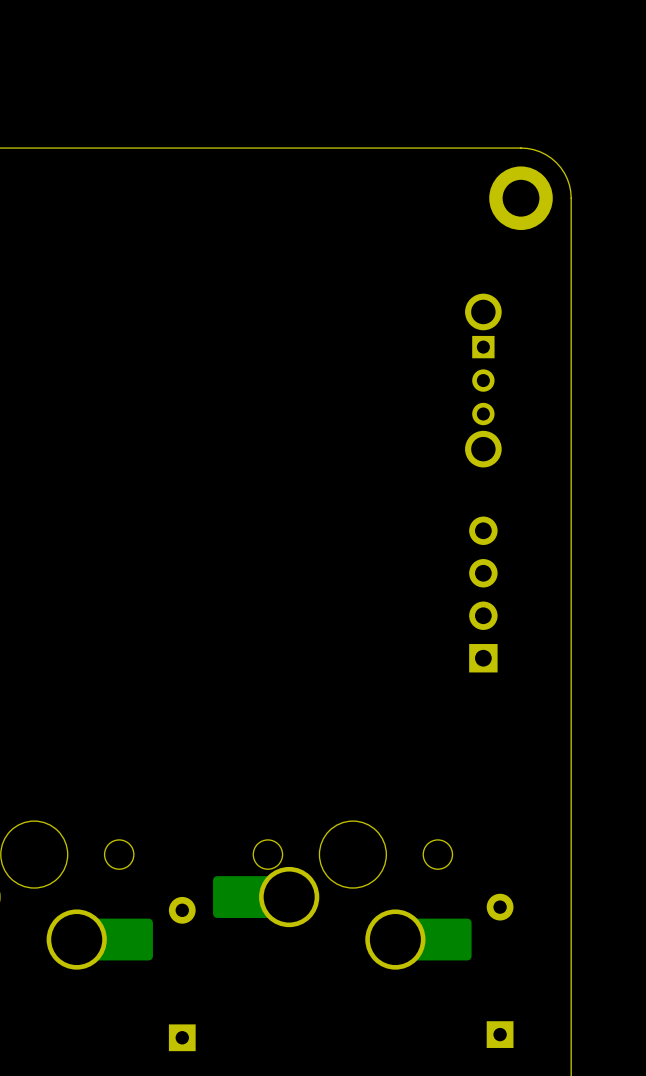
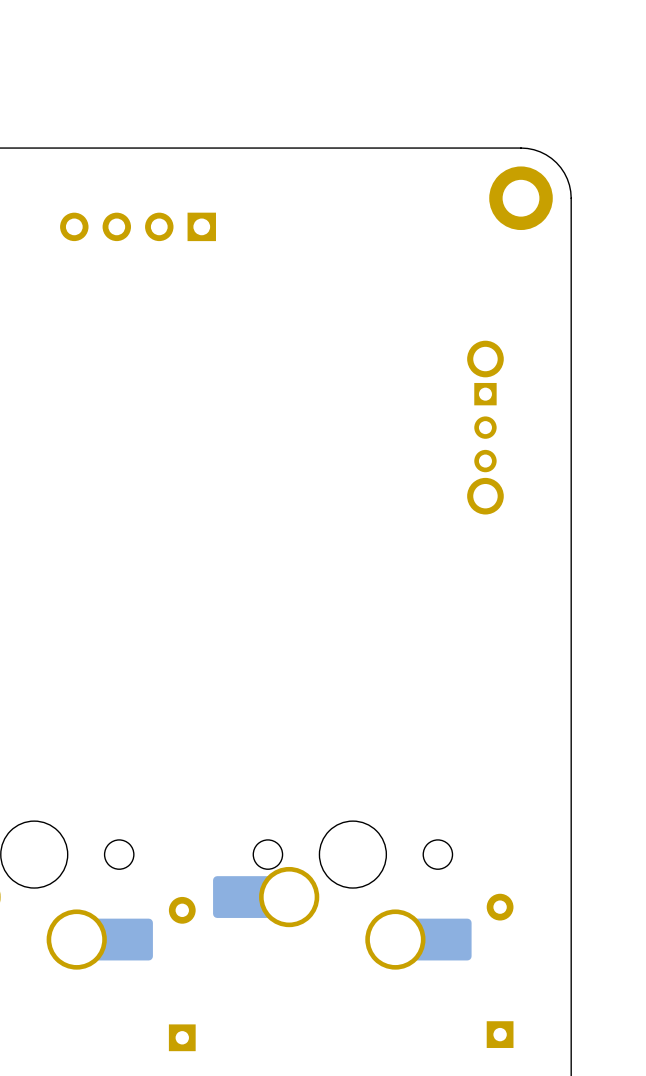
part: none -> (138, 226)
part position: (483, 380) -> (485, 427)
part: (483, 594) -> none

